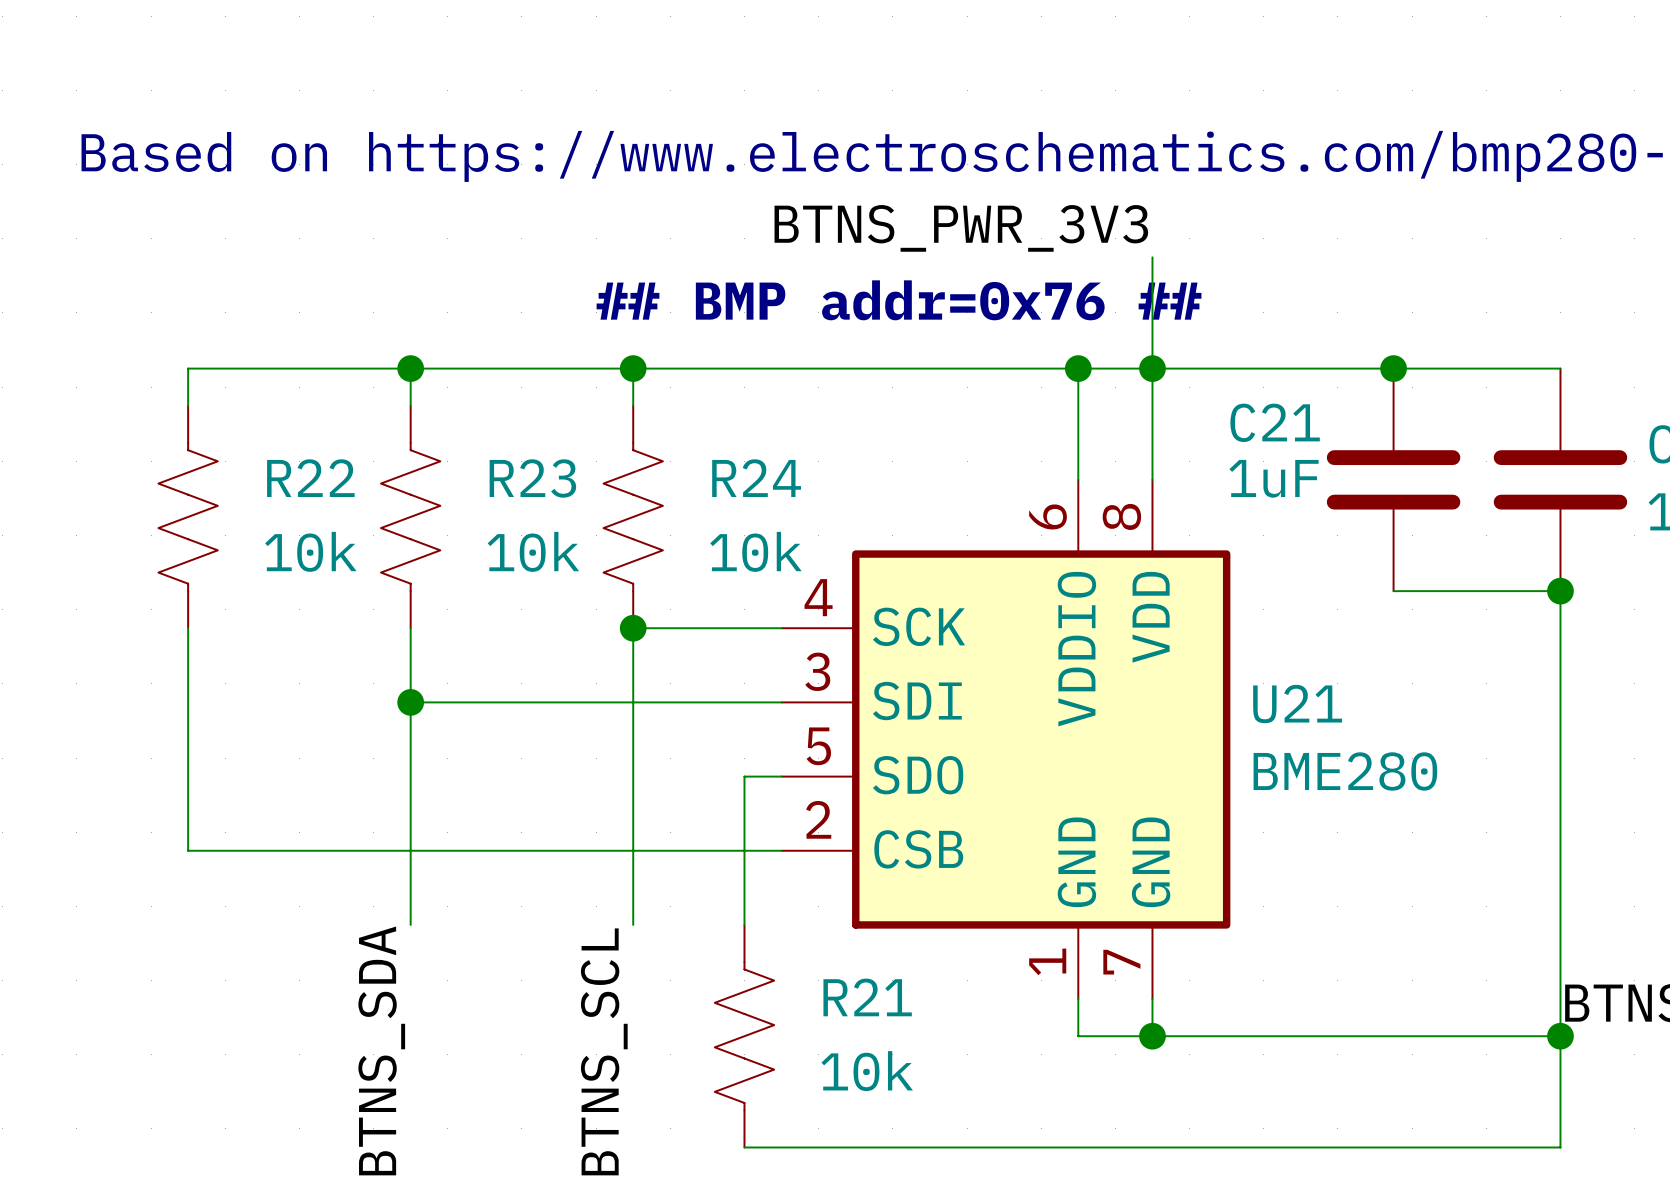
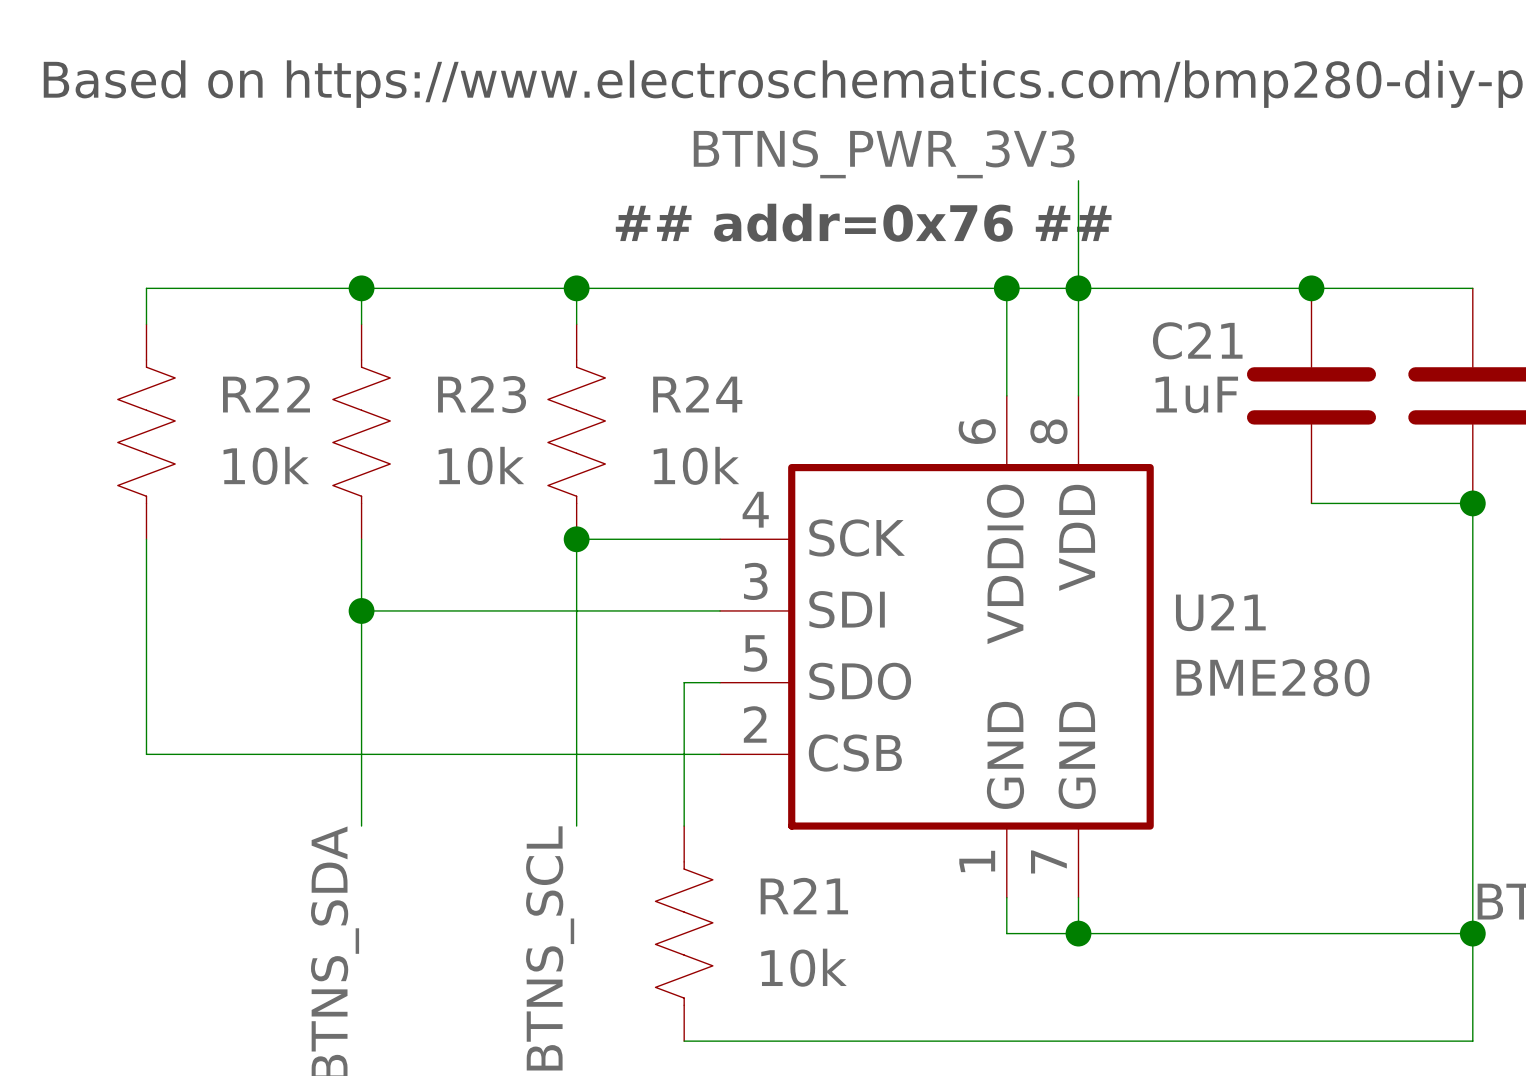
text: ## BMP addr=0x76 ## (899, 300) -> ## addr=0x76 ## (863, 222)

